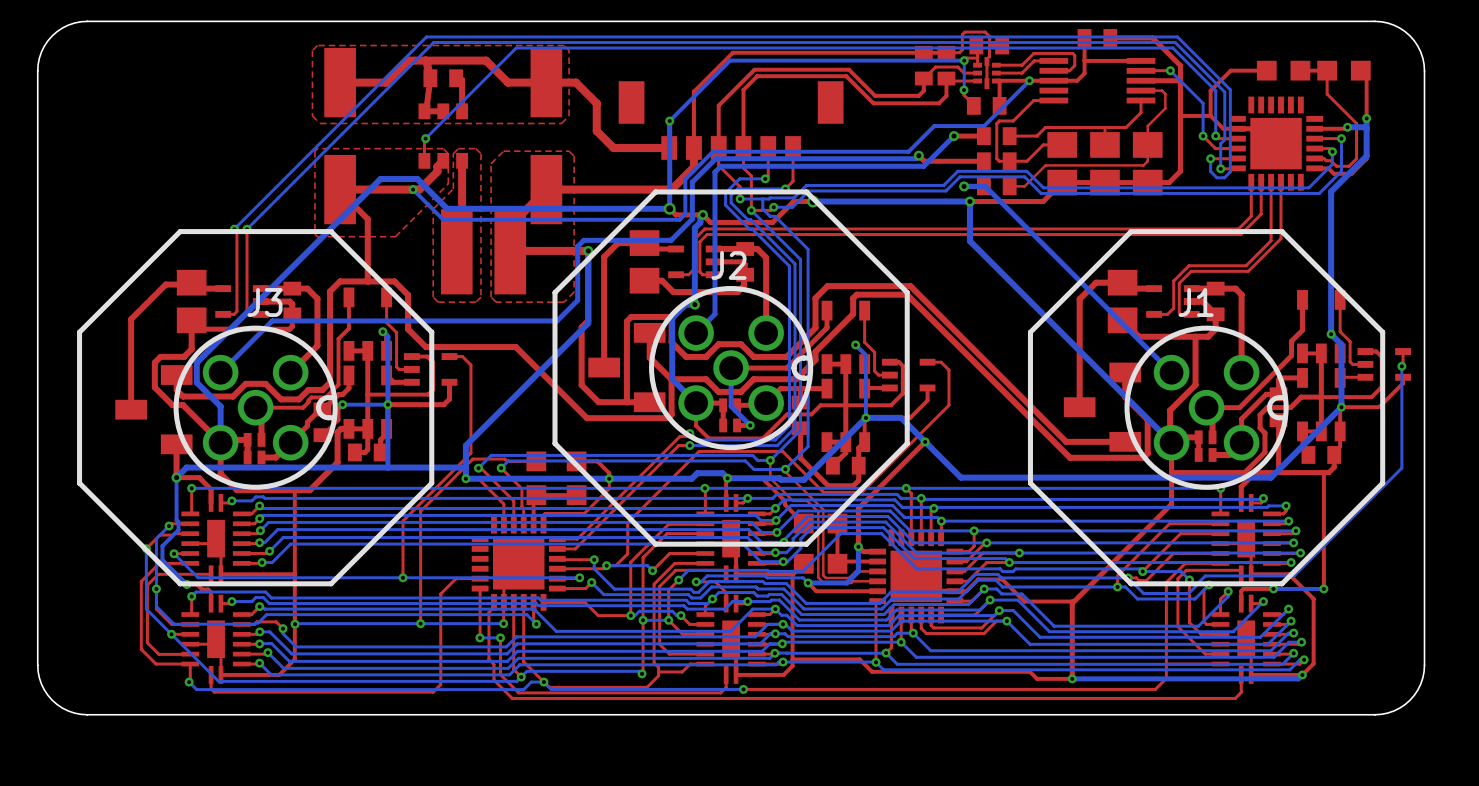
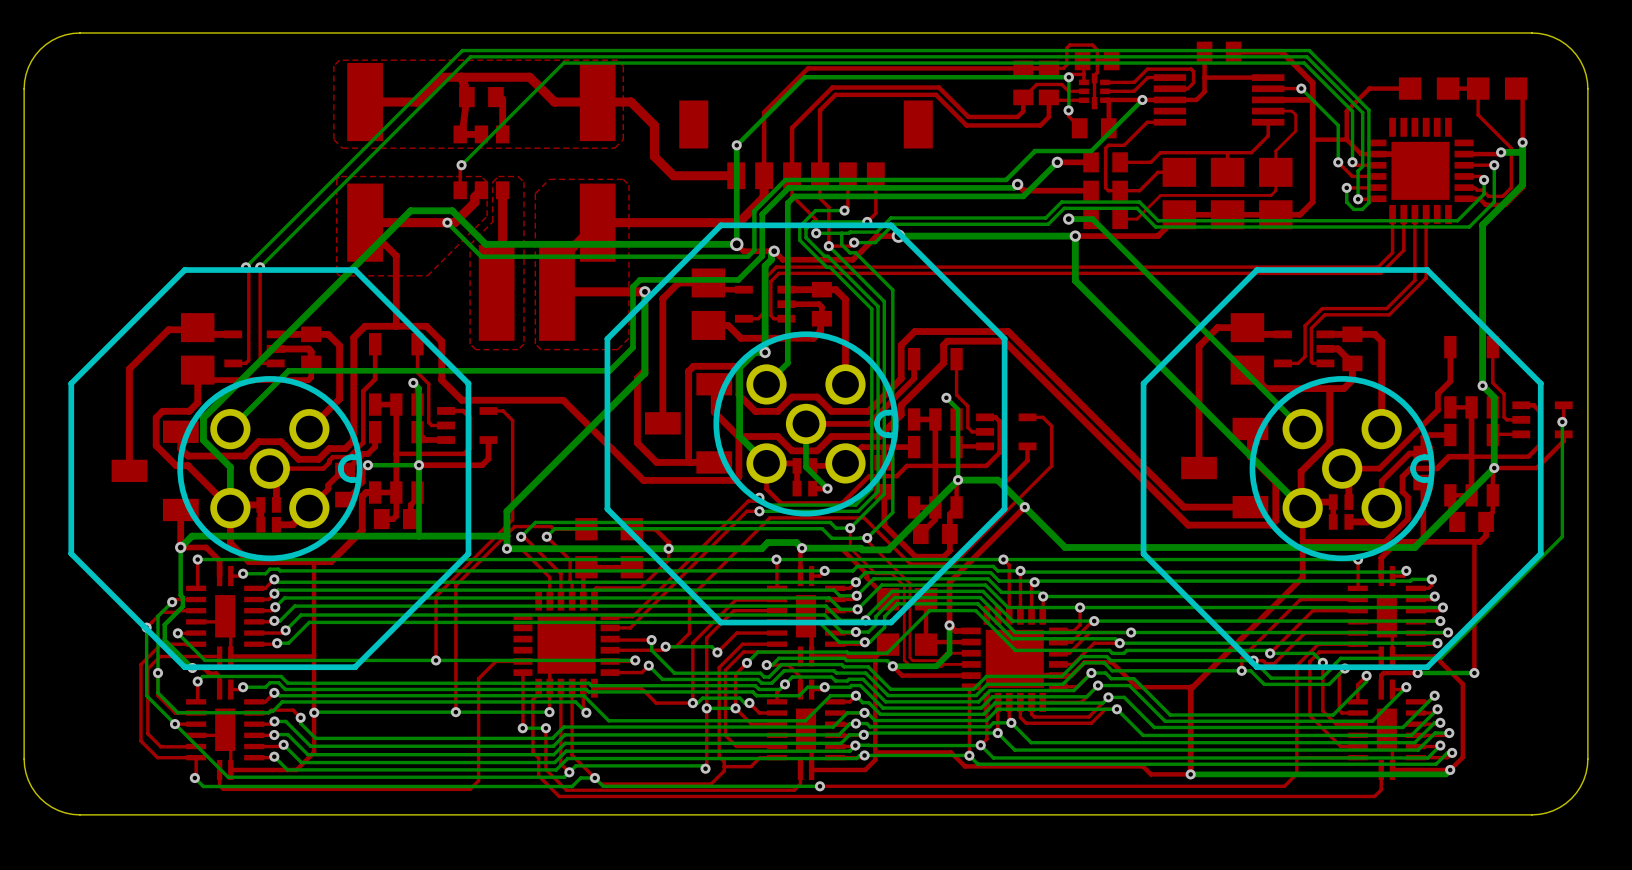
J2 name: J2 (729, 265) -> none
J3 name: J3 (265, 302) -> none
J1 name: J1 (1196, 302) -> none

